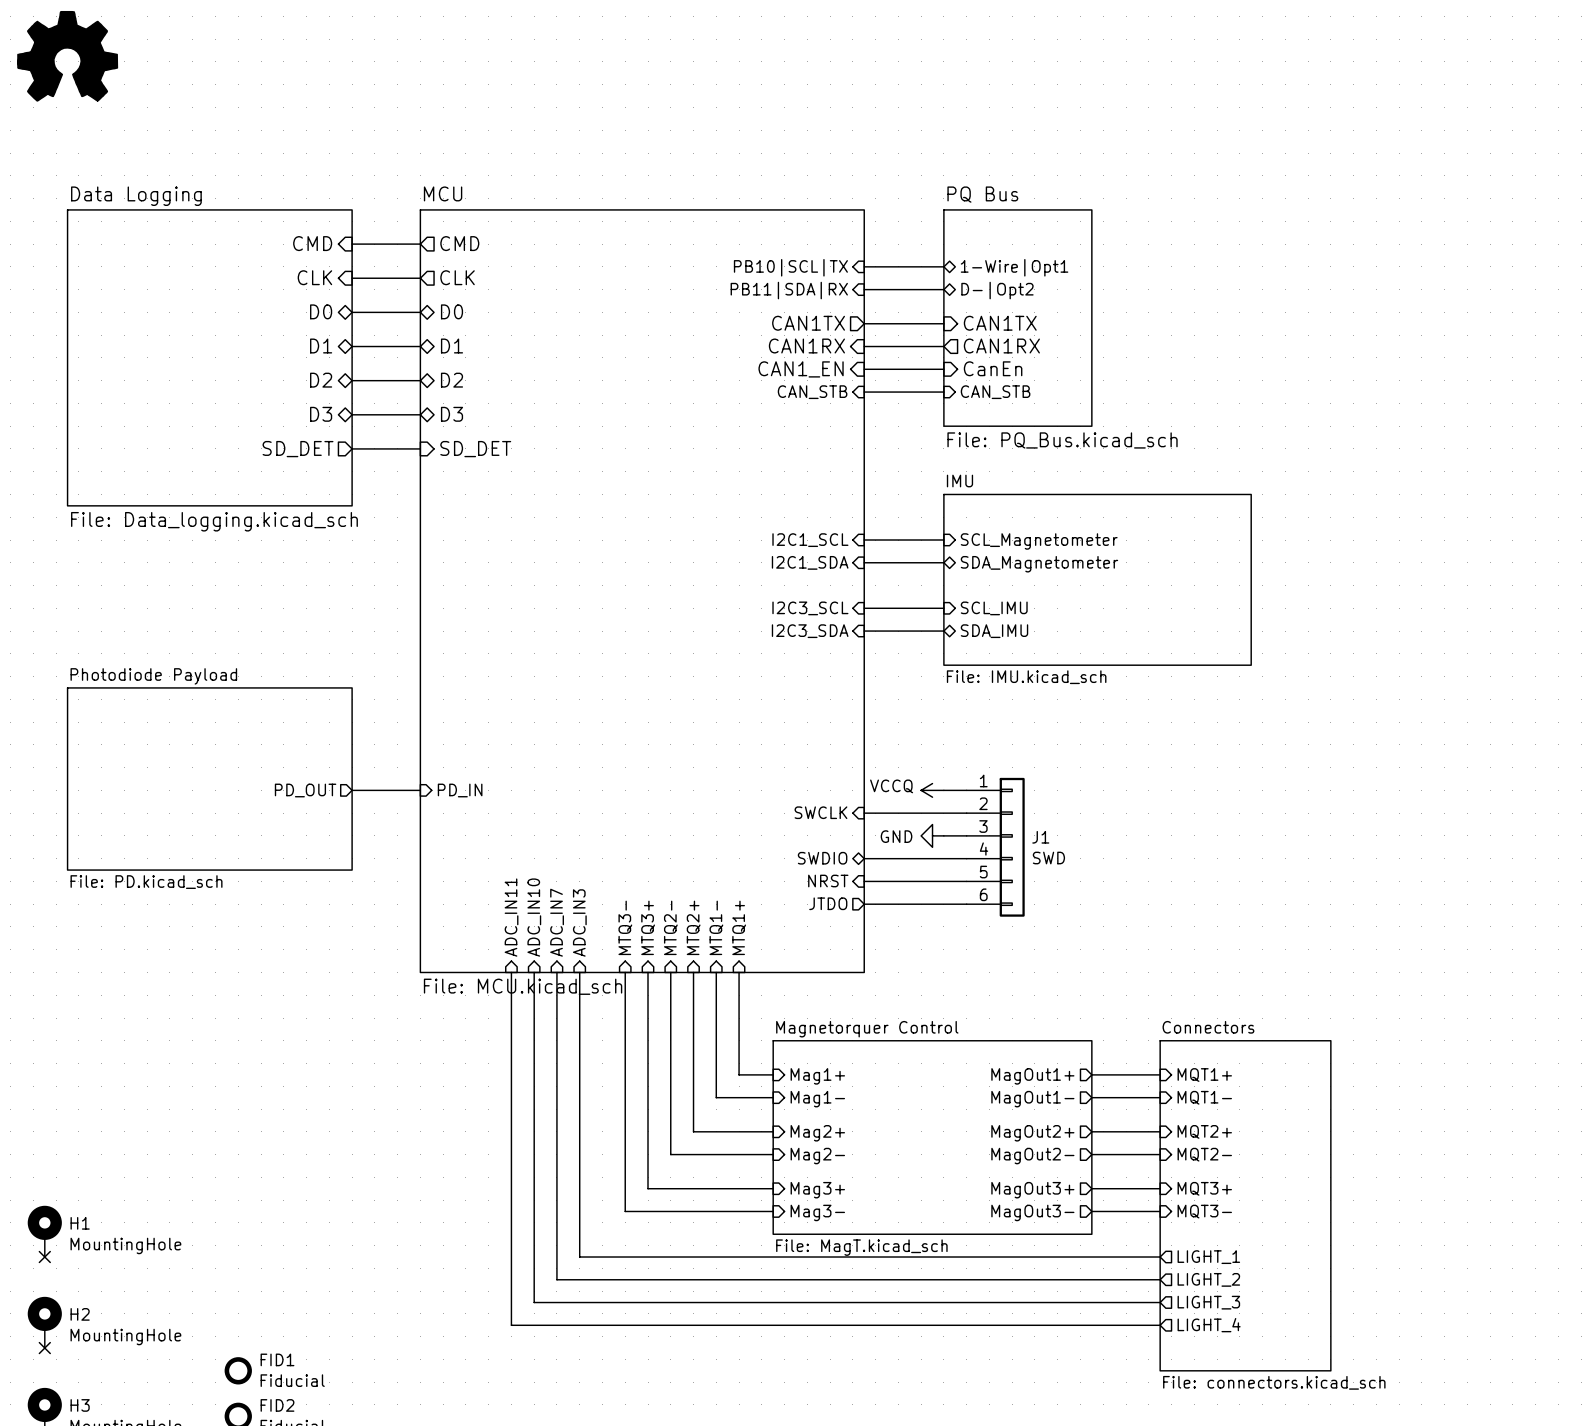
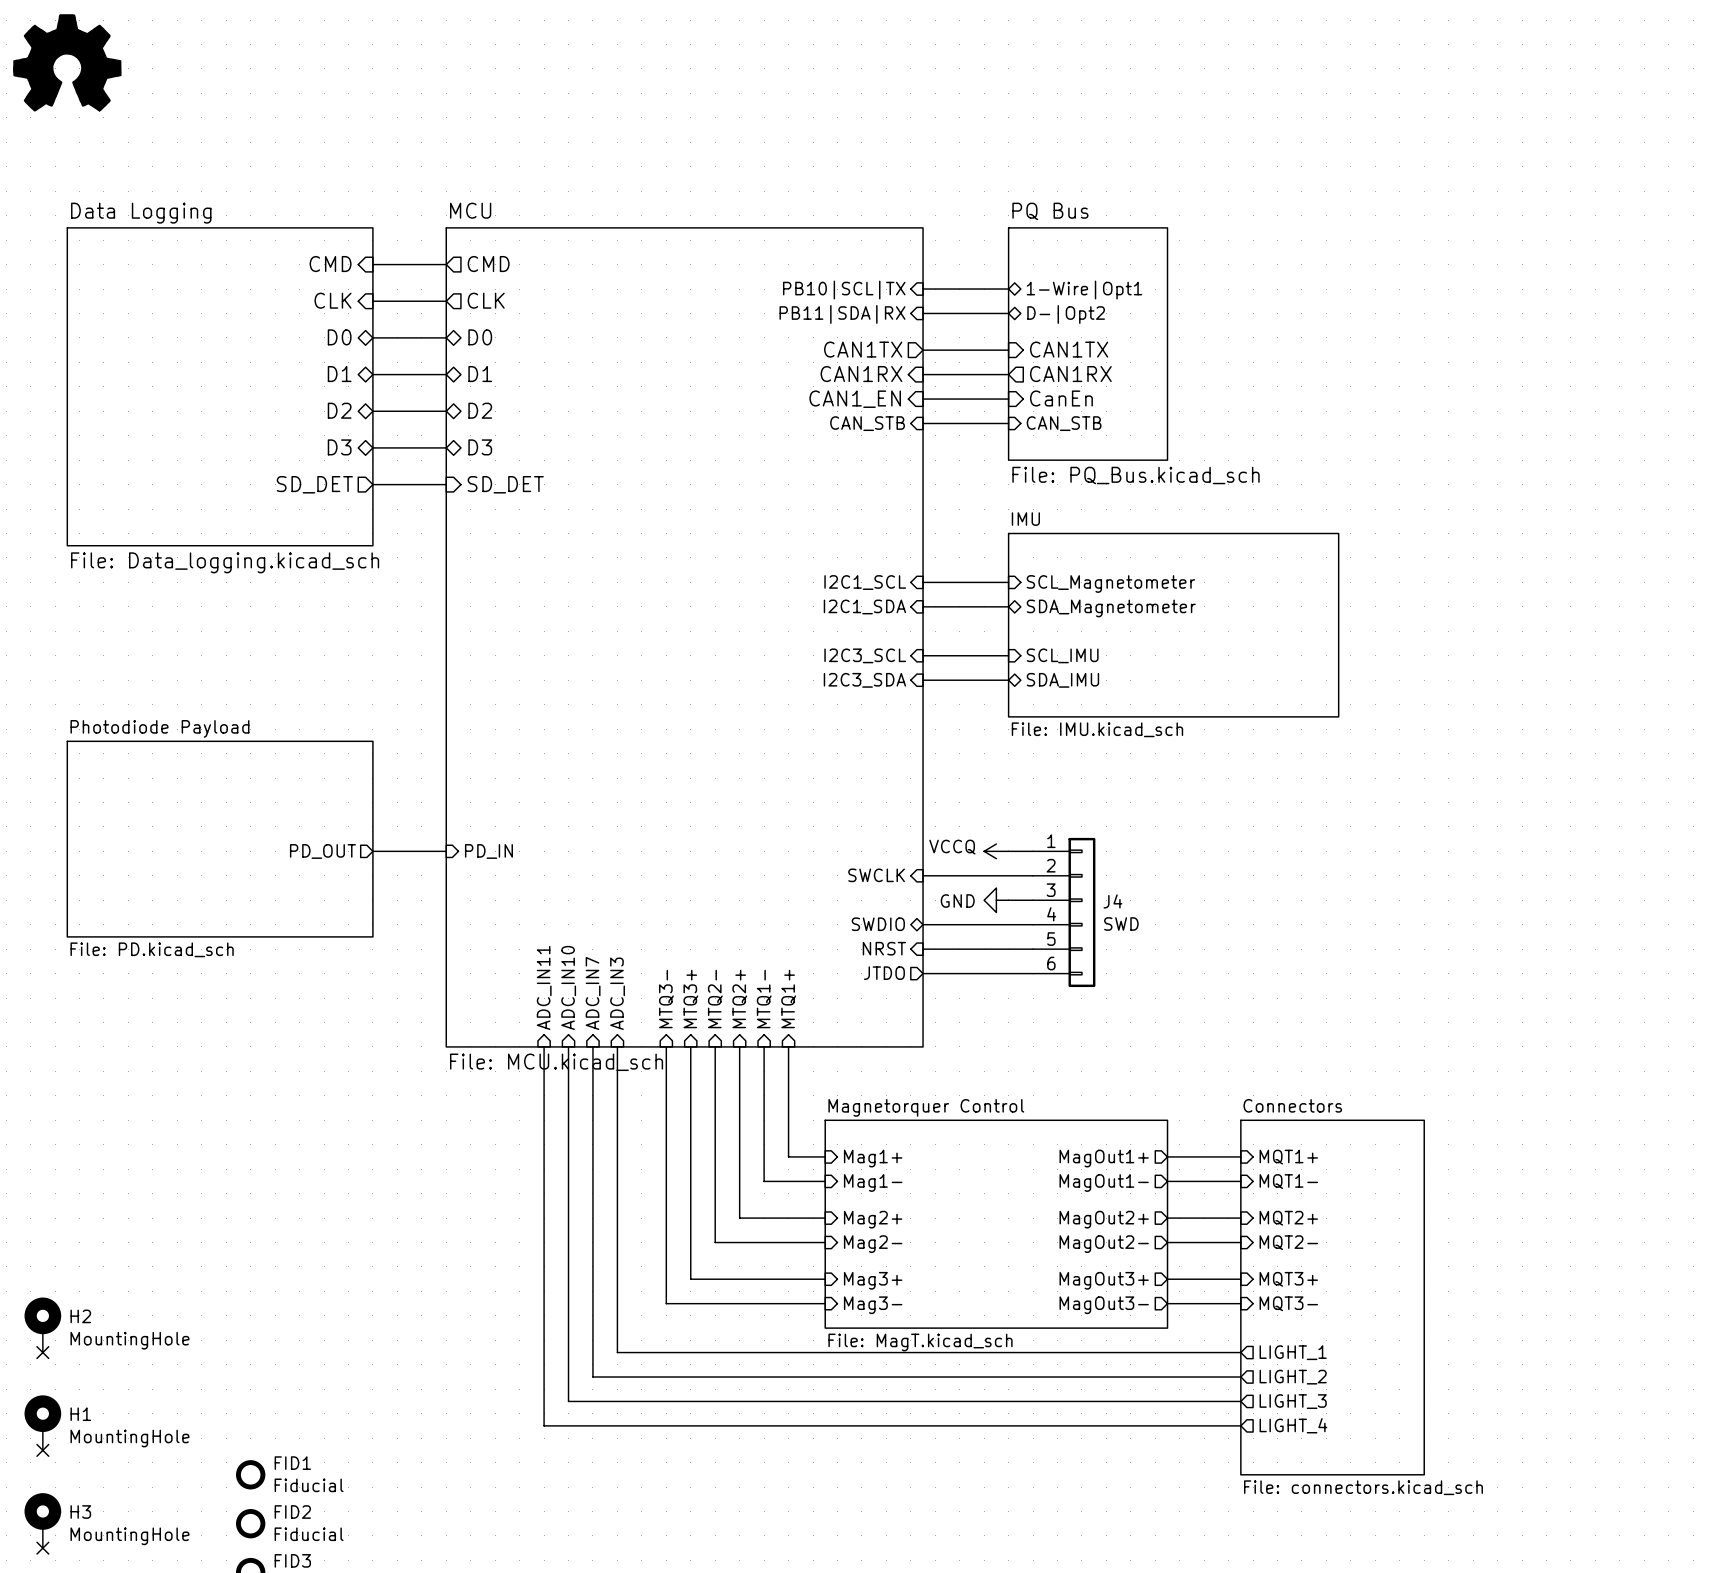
J1 name: J1 (1040, 837) -> J4 (1112, 901)
H1 name: H1 (80, 1223) -> H2 (80, 1316)
H2 name: H2 (80, 1314) -> H1 (80, 1414)

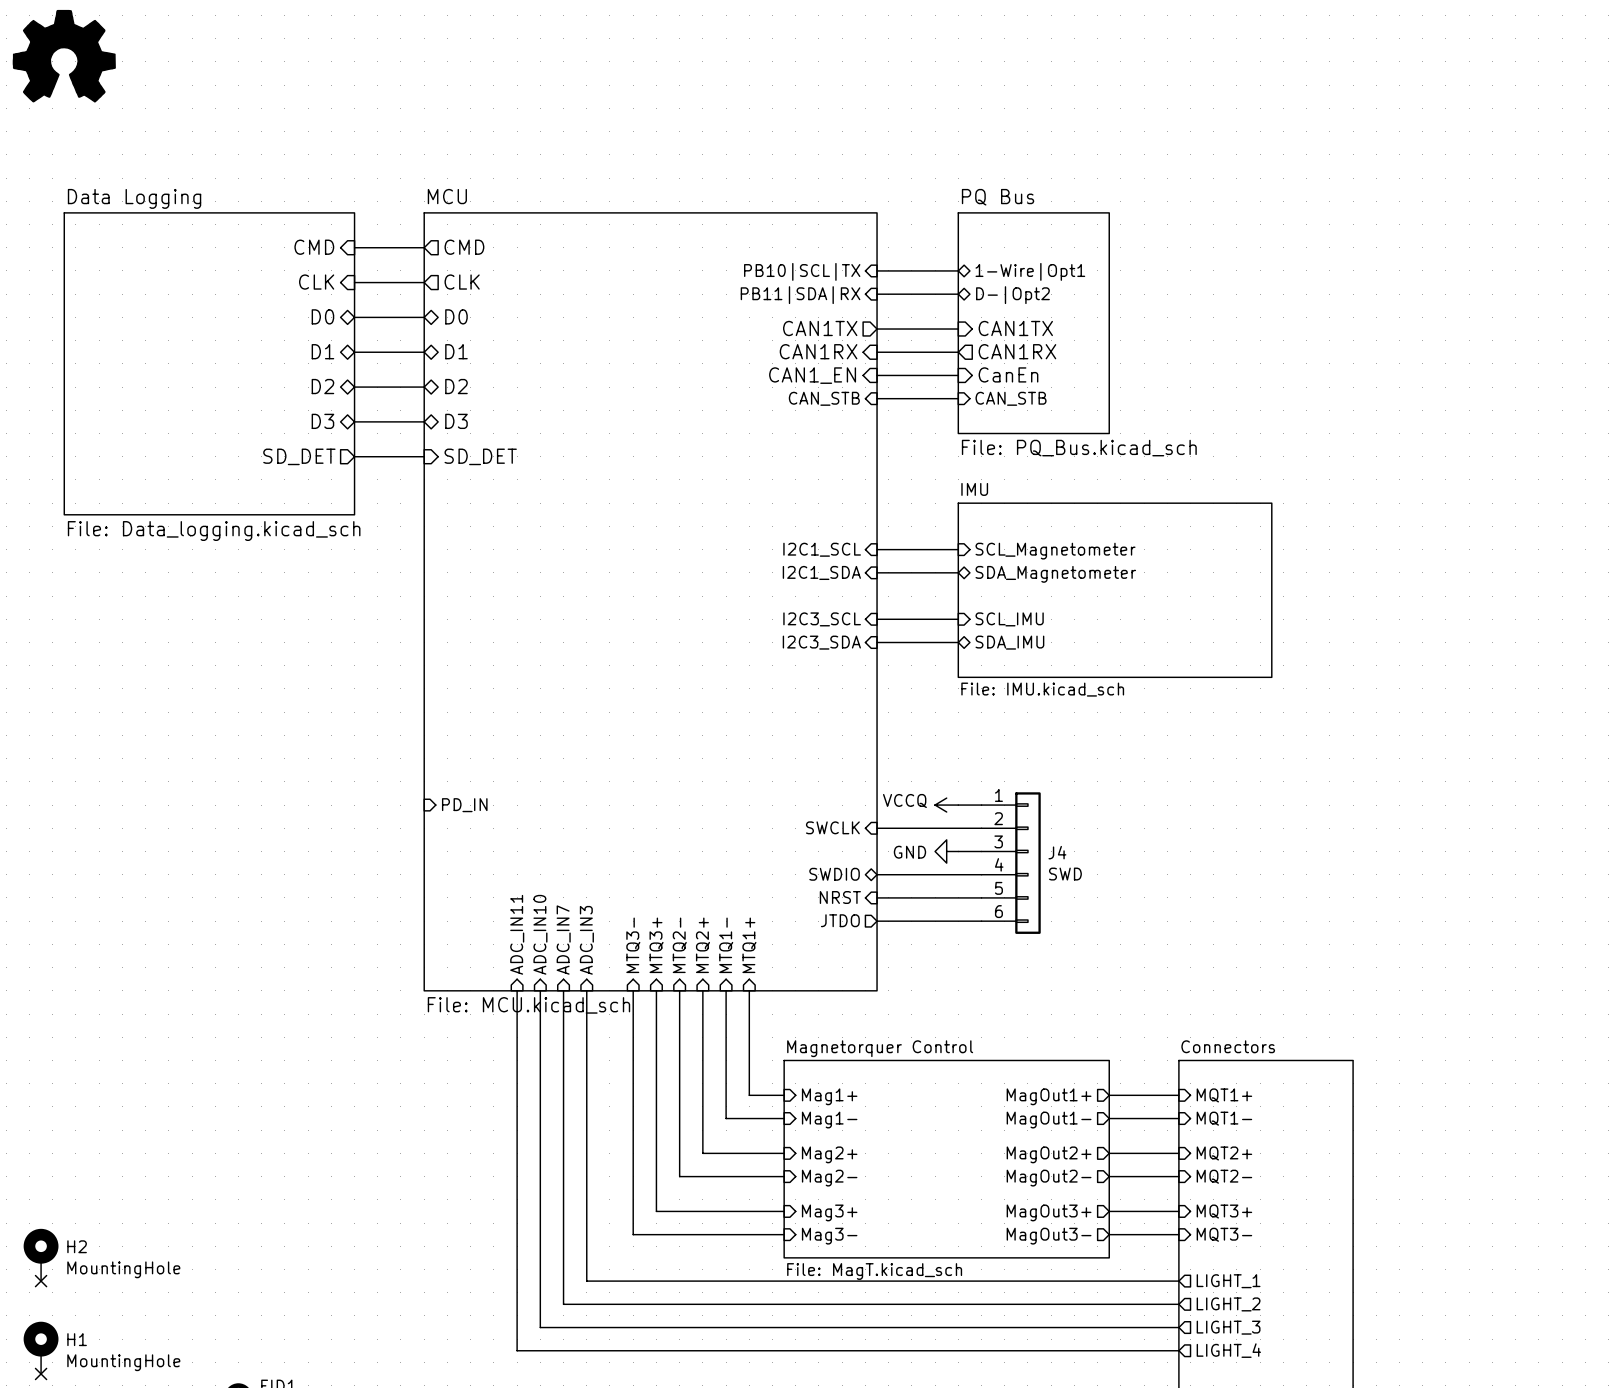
sheet Photodiode Payload: File: PD.kicad_sch (220, 839) -> none
sheet pin: PD_OUT (322, 851) -> none
wire: (372, 851) (446, 851) -> none

